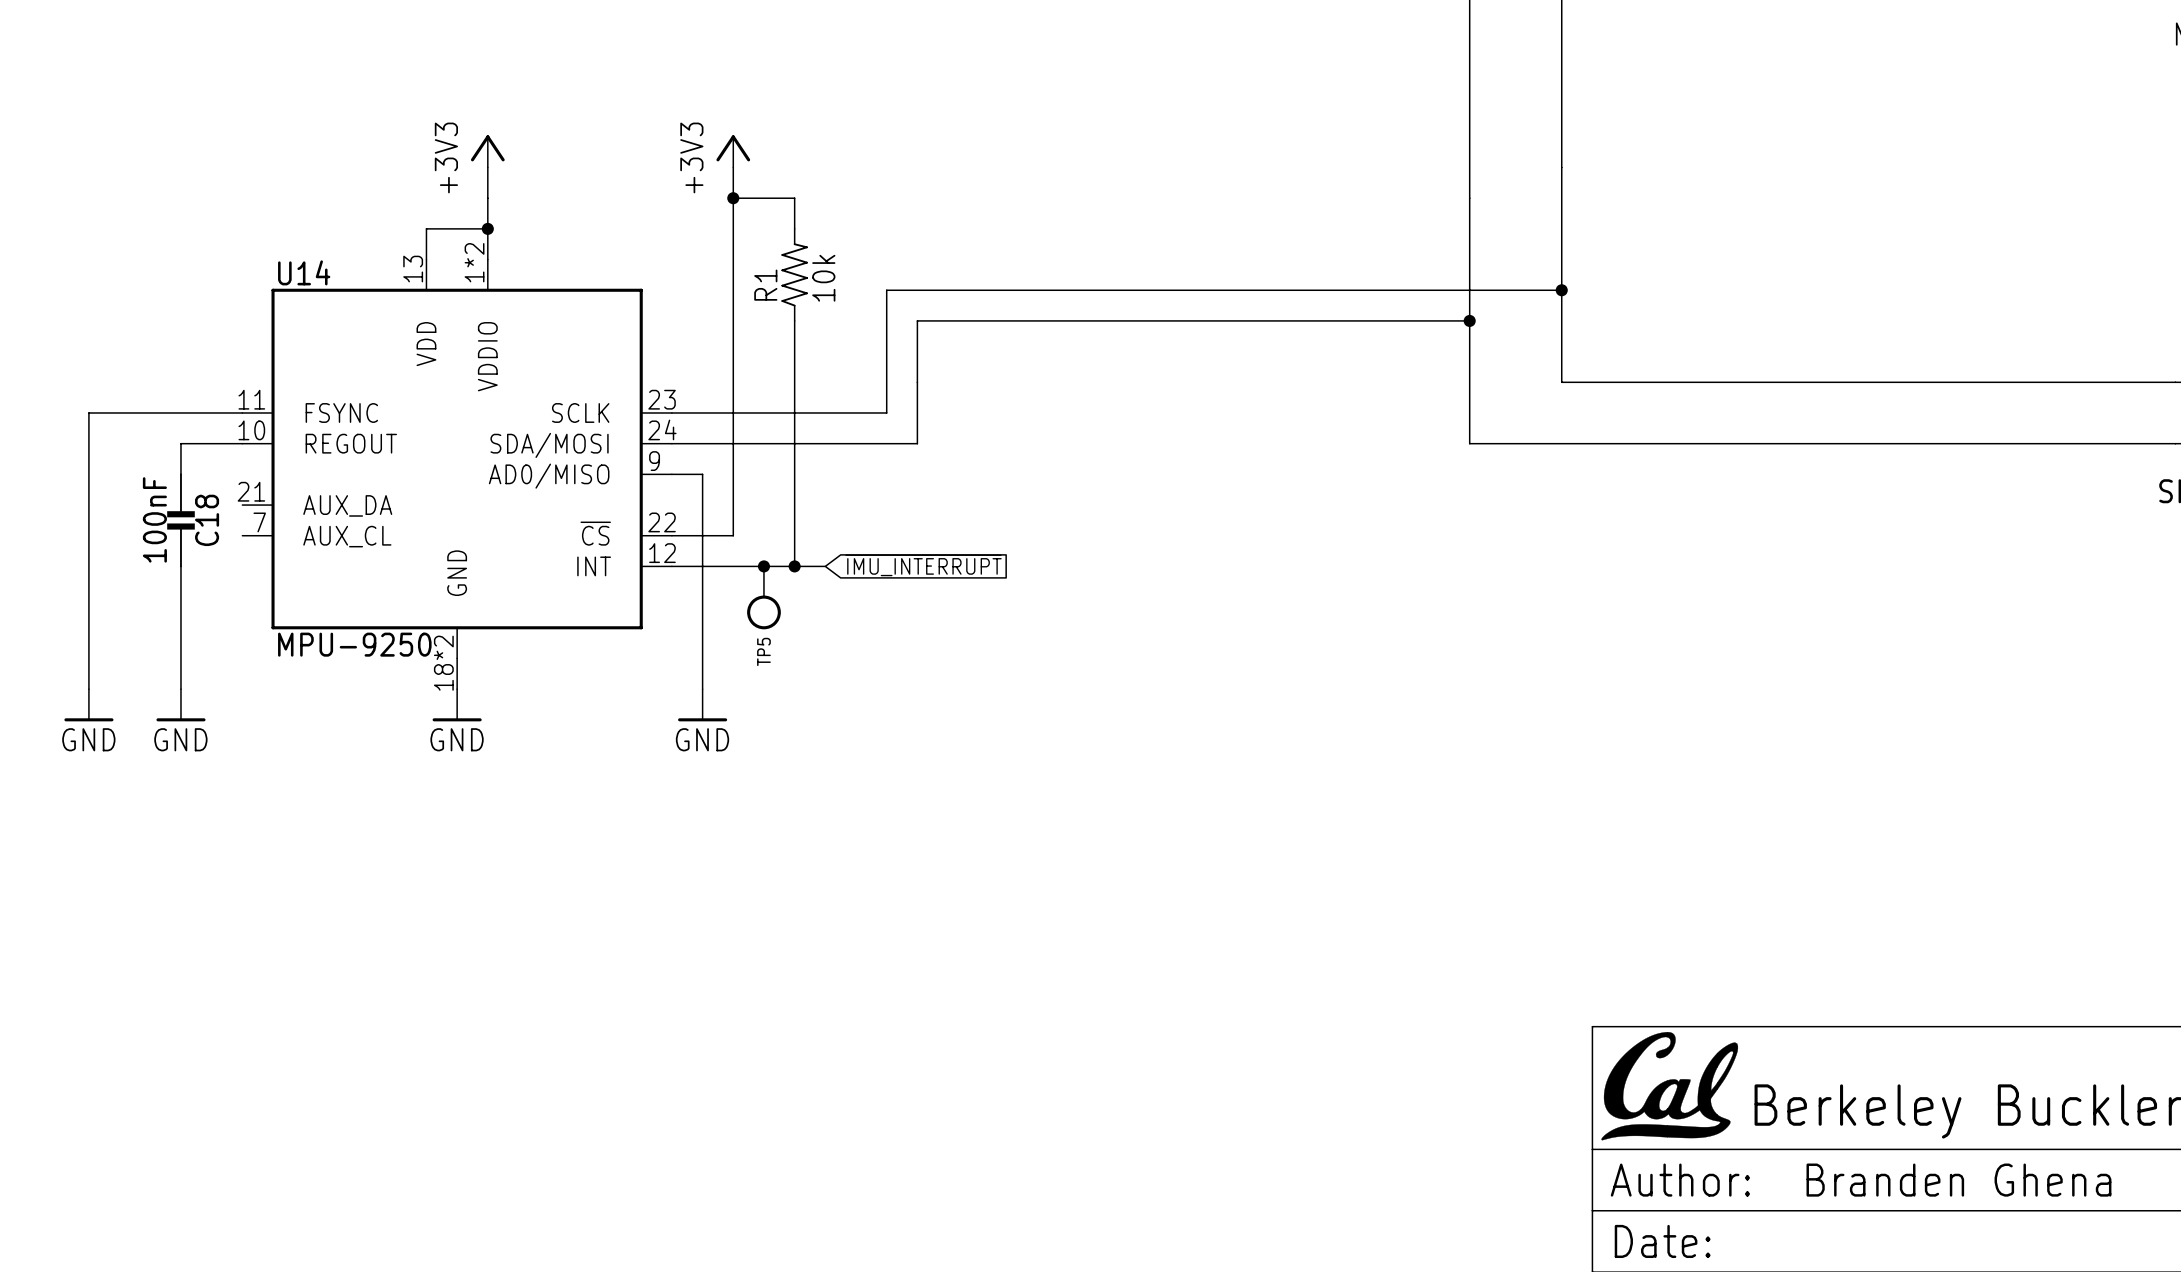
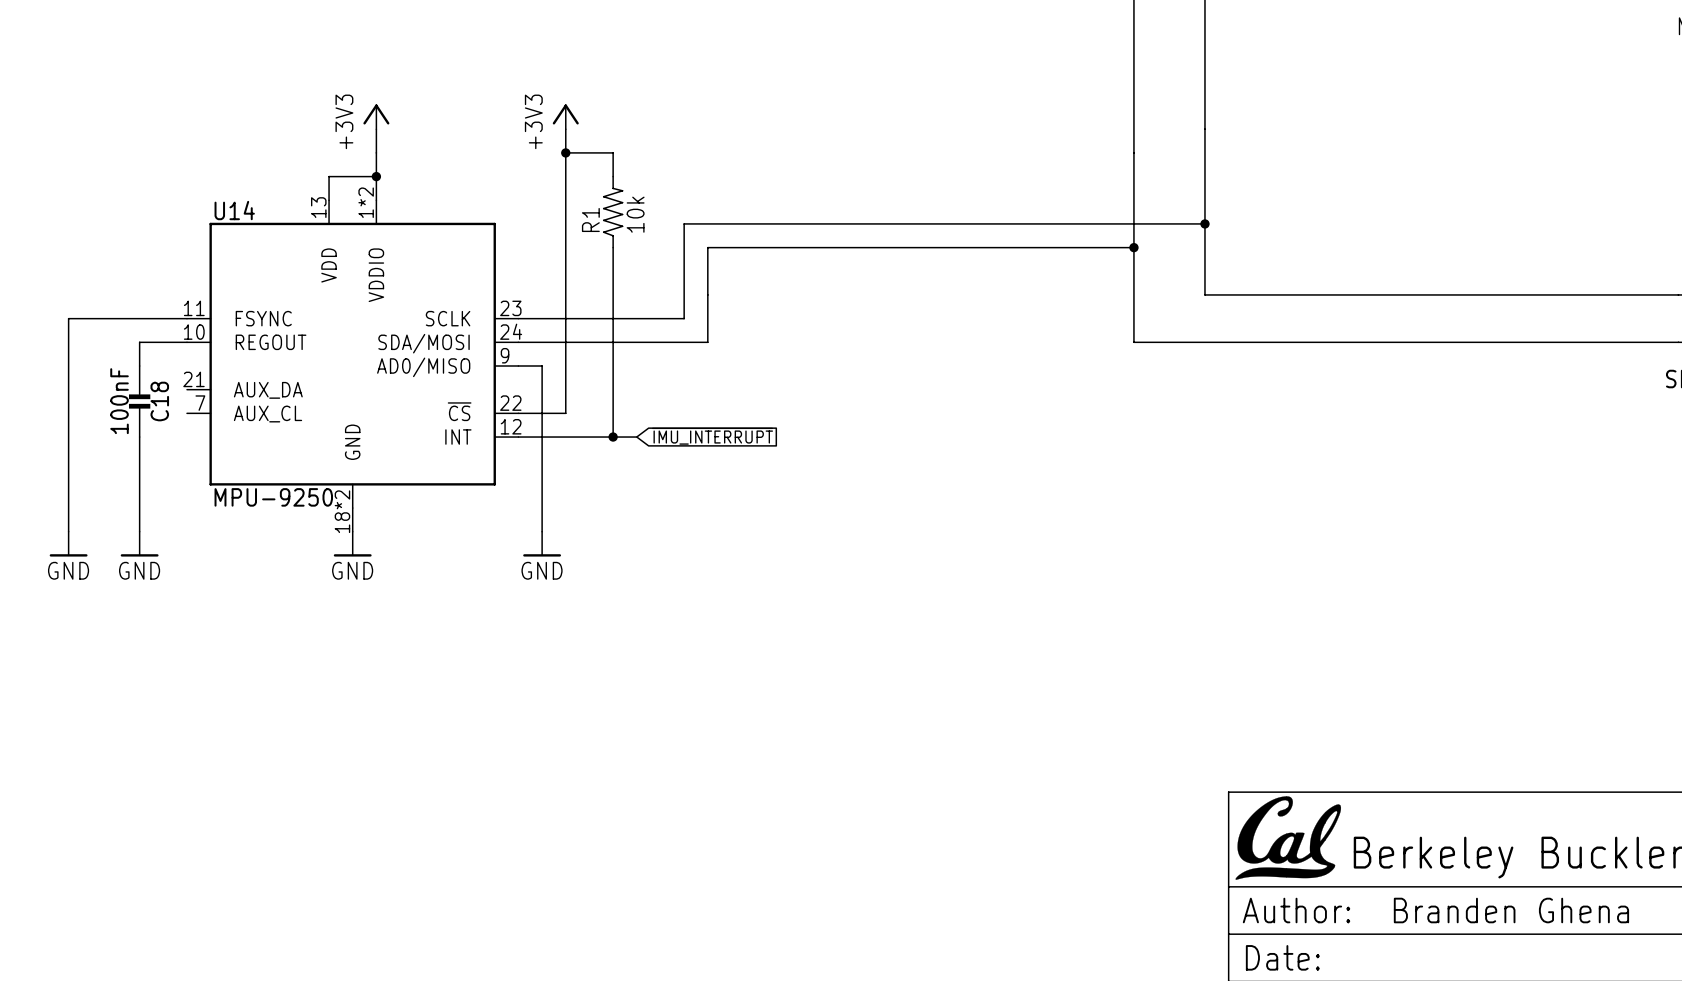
junction: (763, 566) -> none
TP5: (763, 597) -> none

